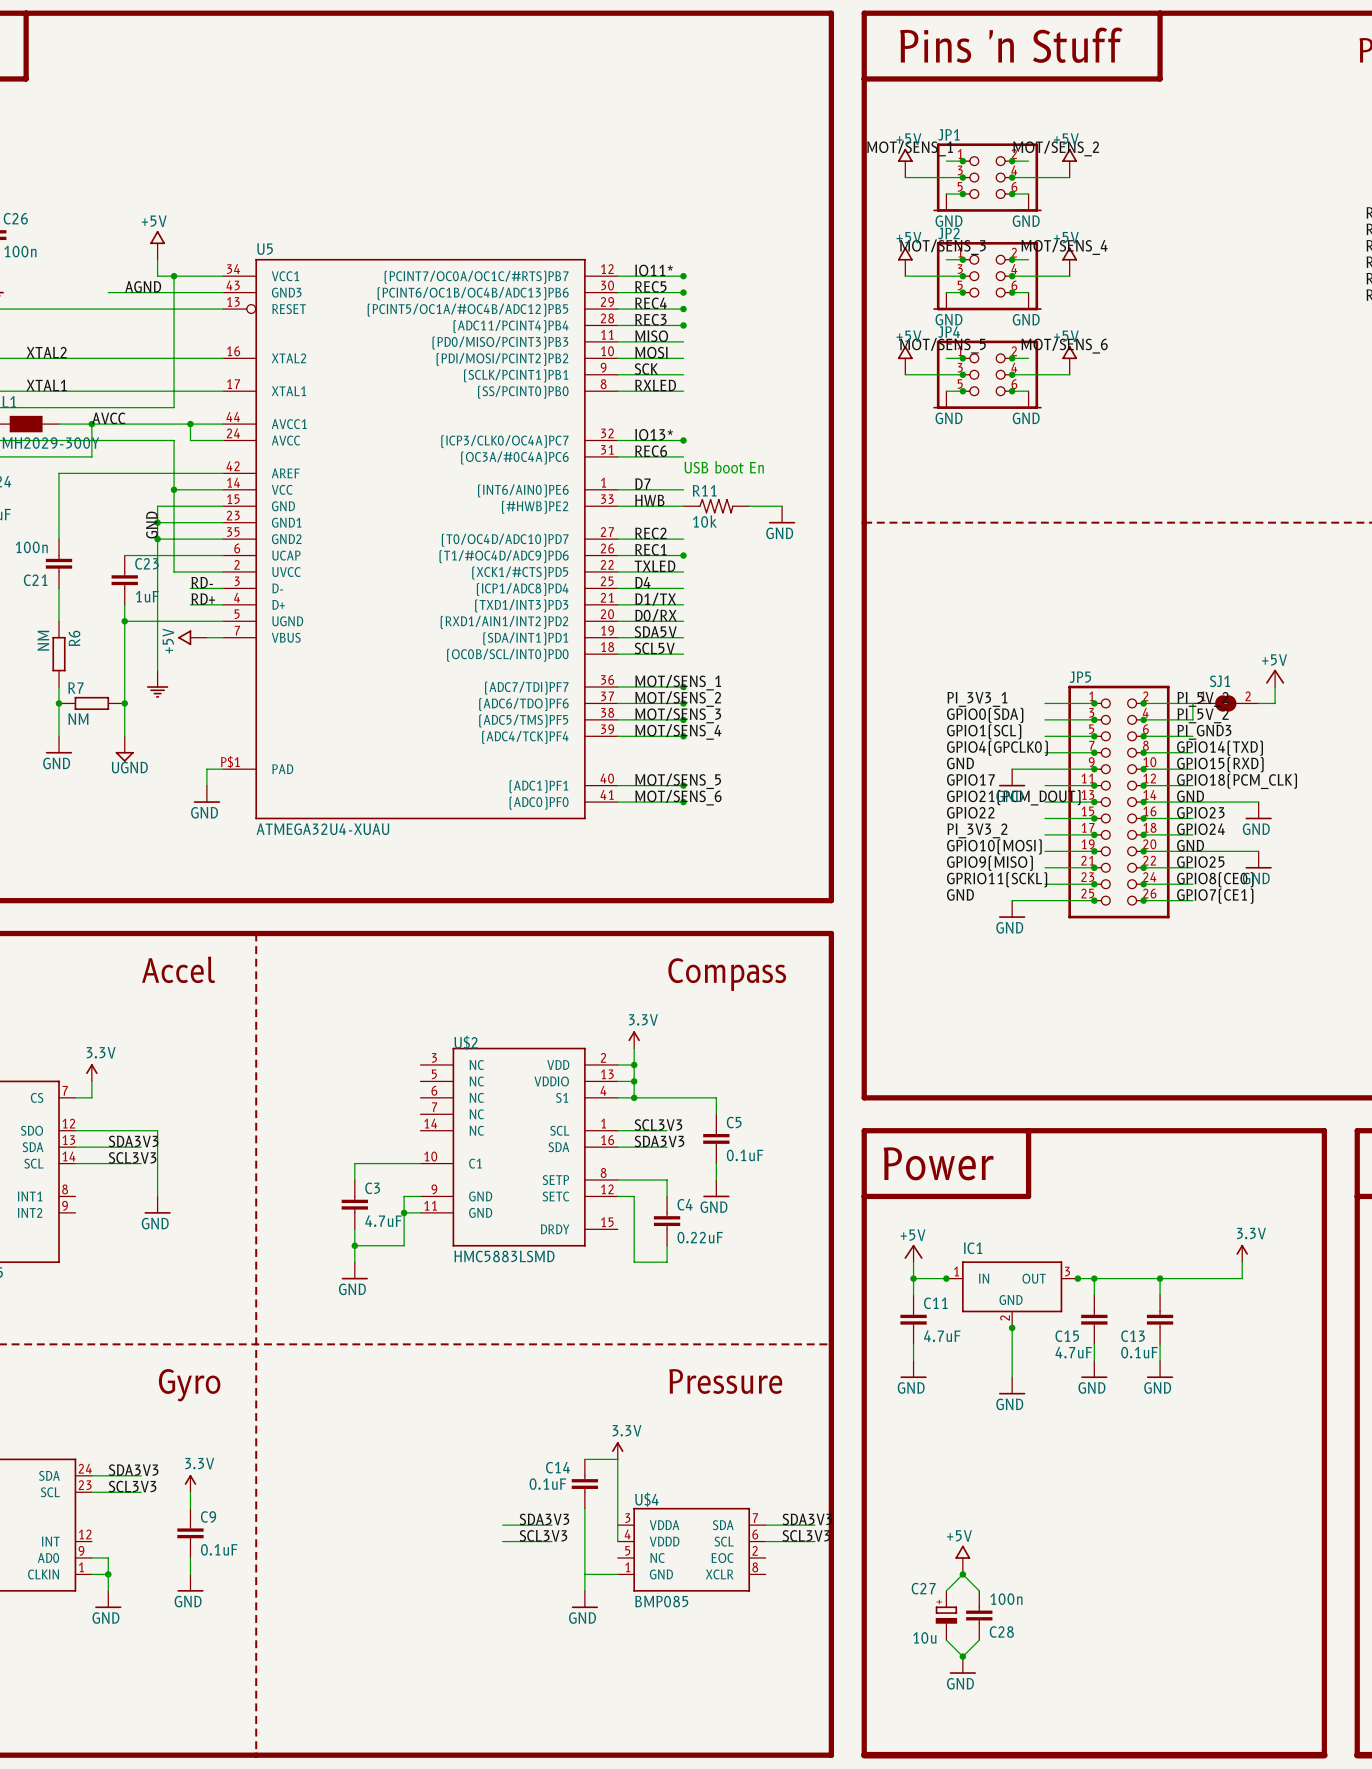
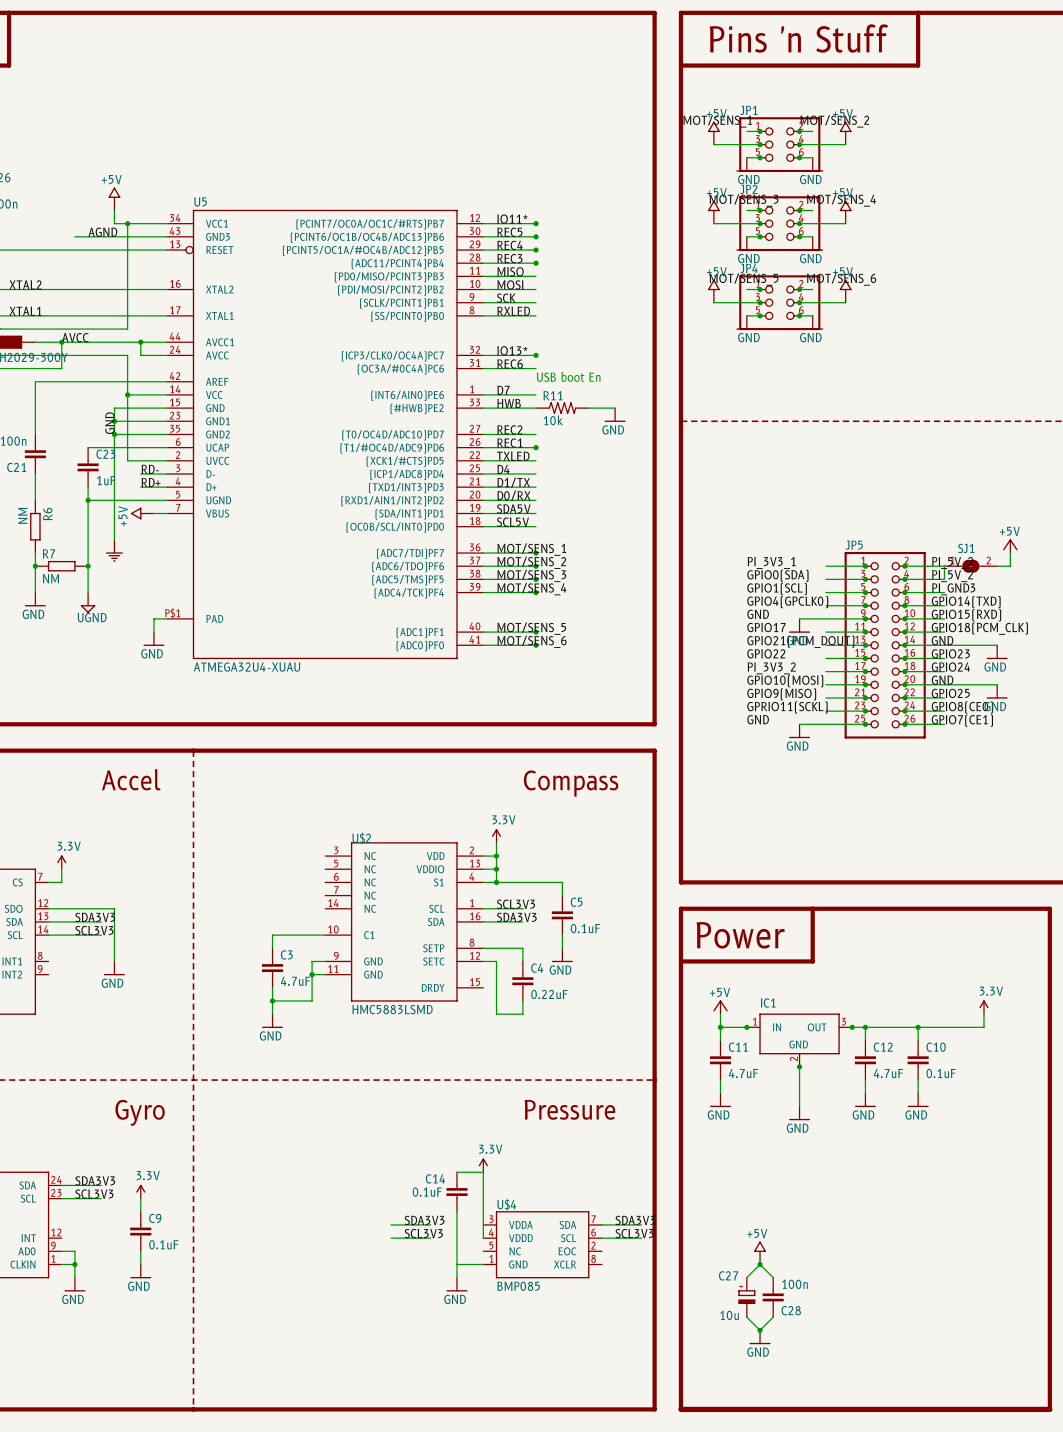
C15 name: C15 (1067, 1336) -> C12 (883, 1047)
C13 name: C13 (1133, 1336) -> C10 (936, 1047)
C15 value position: 4.7uF (1073, 1352) -> 4.7uF (888, 1073)
C13 value position: 0.1uF (1139, 1352) -> 0.1uF (941, 1073)

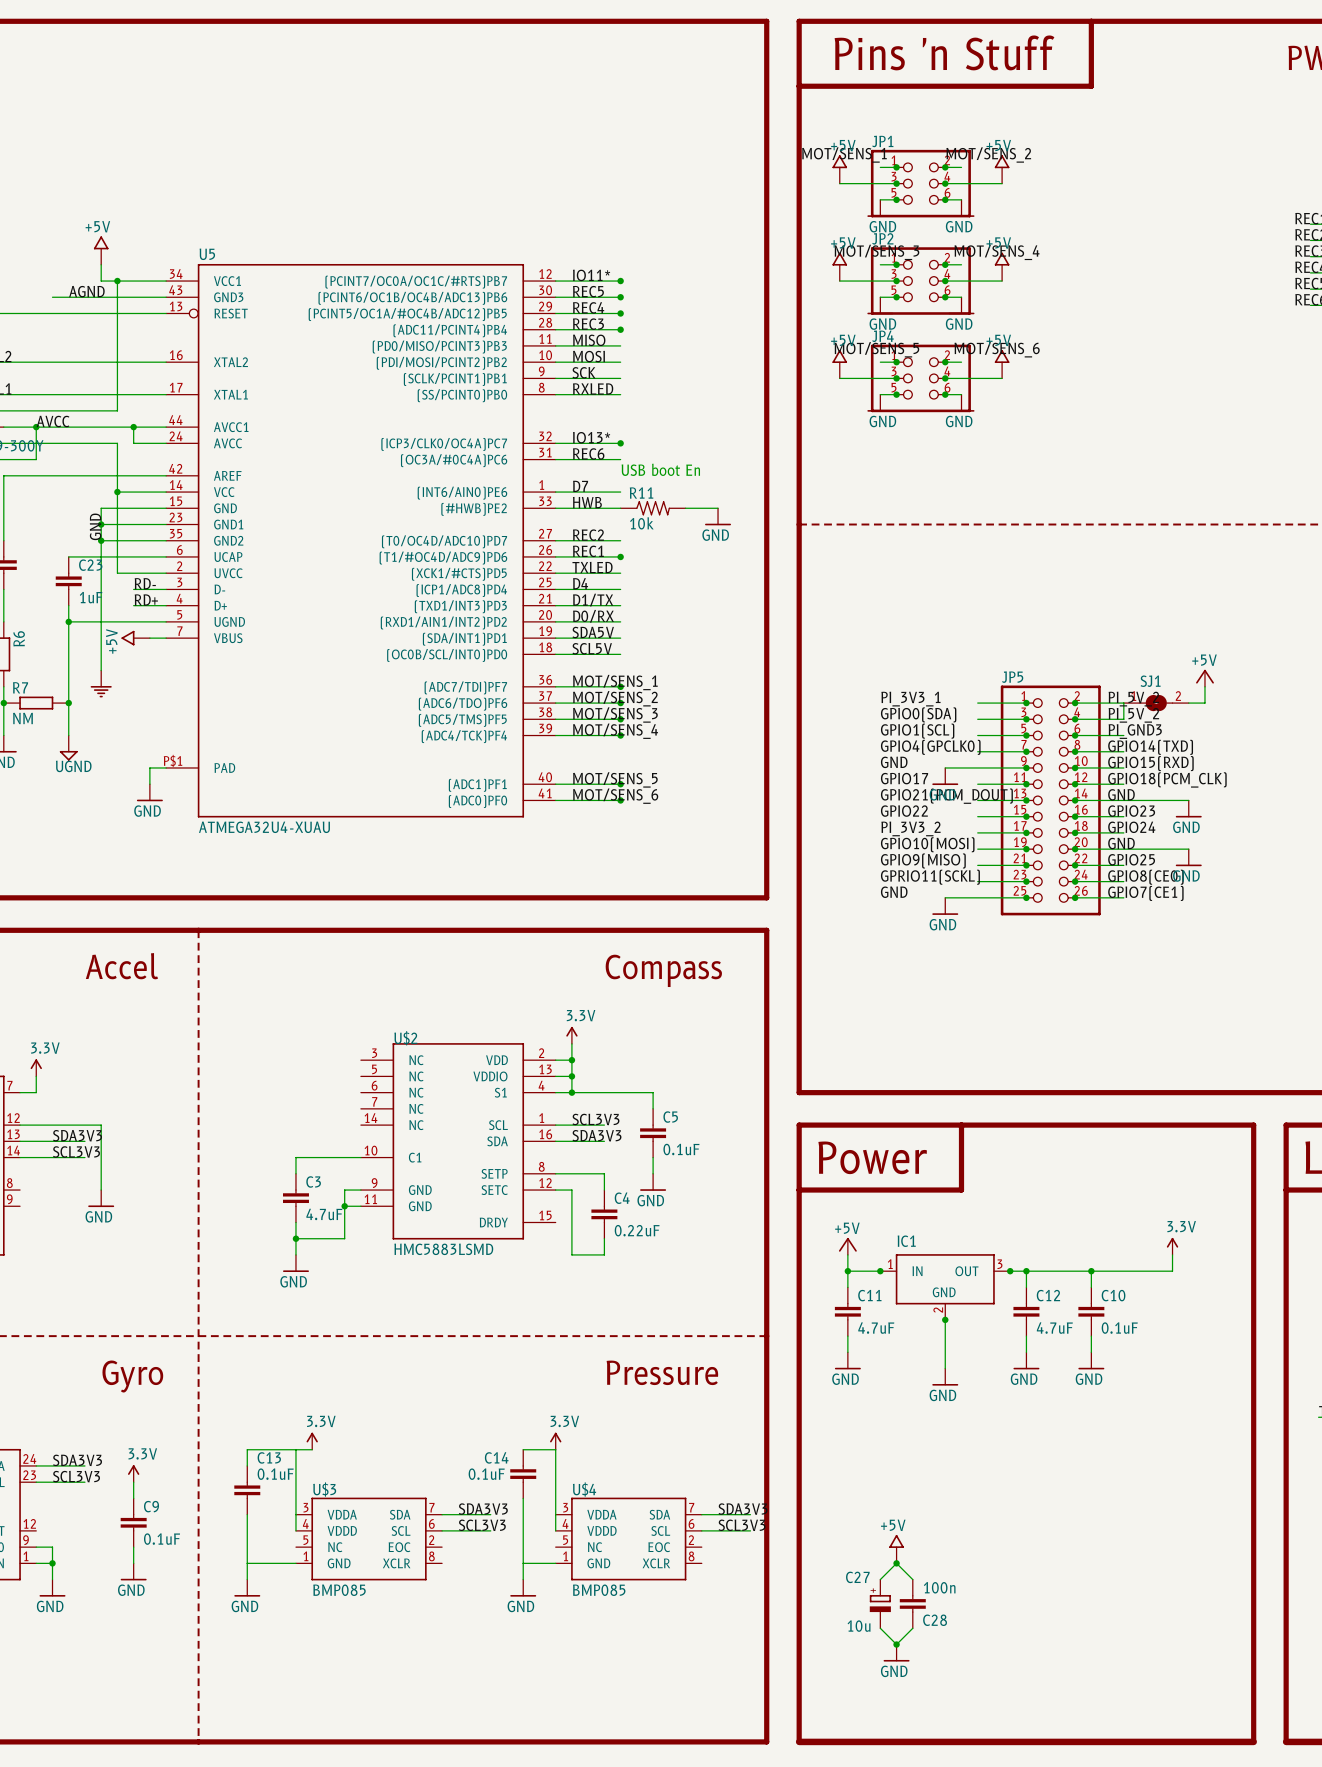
power symbol: none -> 3.3V (312, 1441)
wire: none -> (295, 1449) (295, 1530)
wire: none -> (312, 1449) (247, 1449) (247, 1465)
C13: none -> 0.1uF (247, 1490)
wire: none -> (247, 1514) (247, 1579)
U$3: none -> BMP085 (369, 1539)
wire: none -> (247, 1563) (295, 1563)
power symbol: none -> GND (247, 1588)

